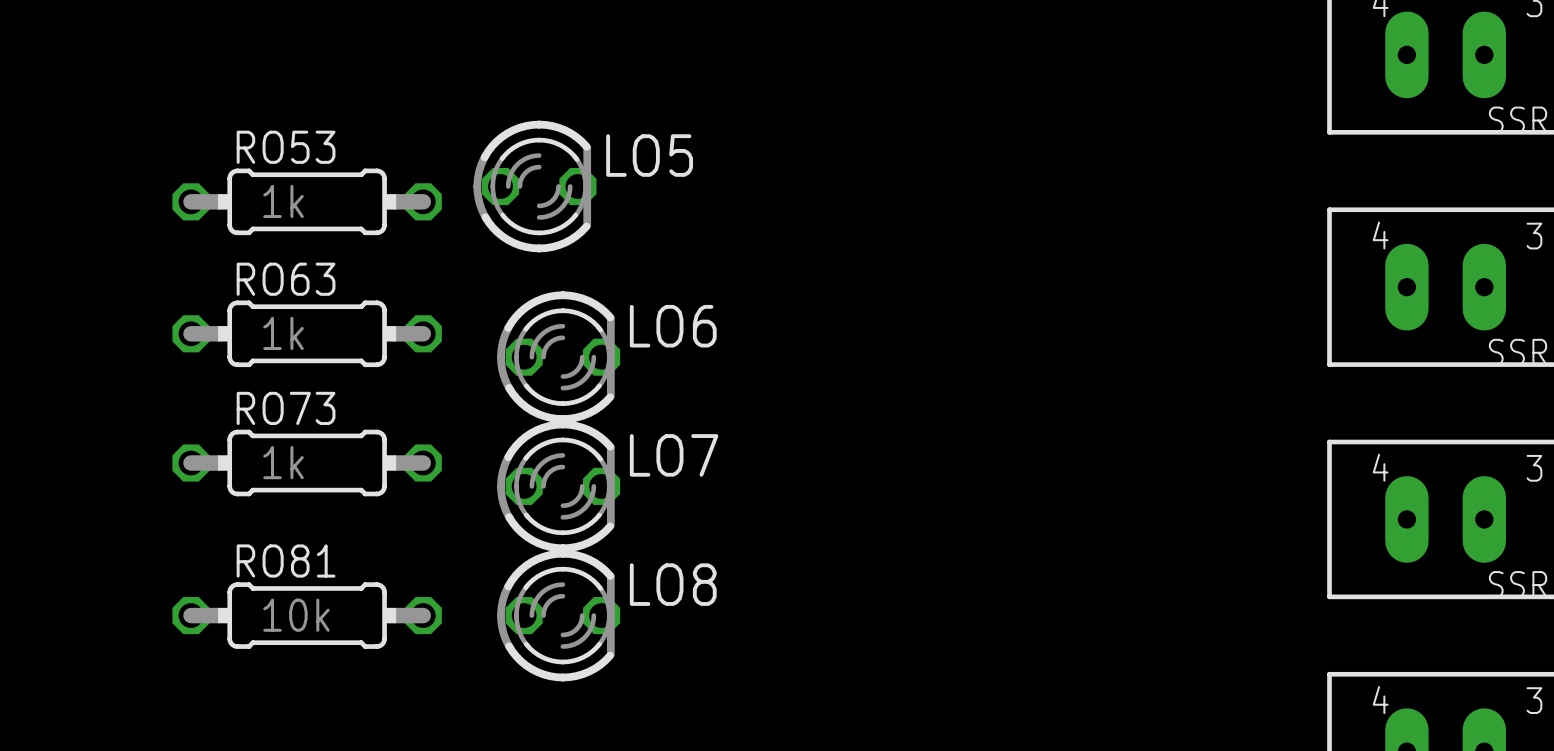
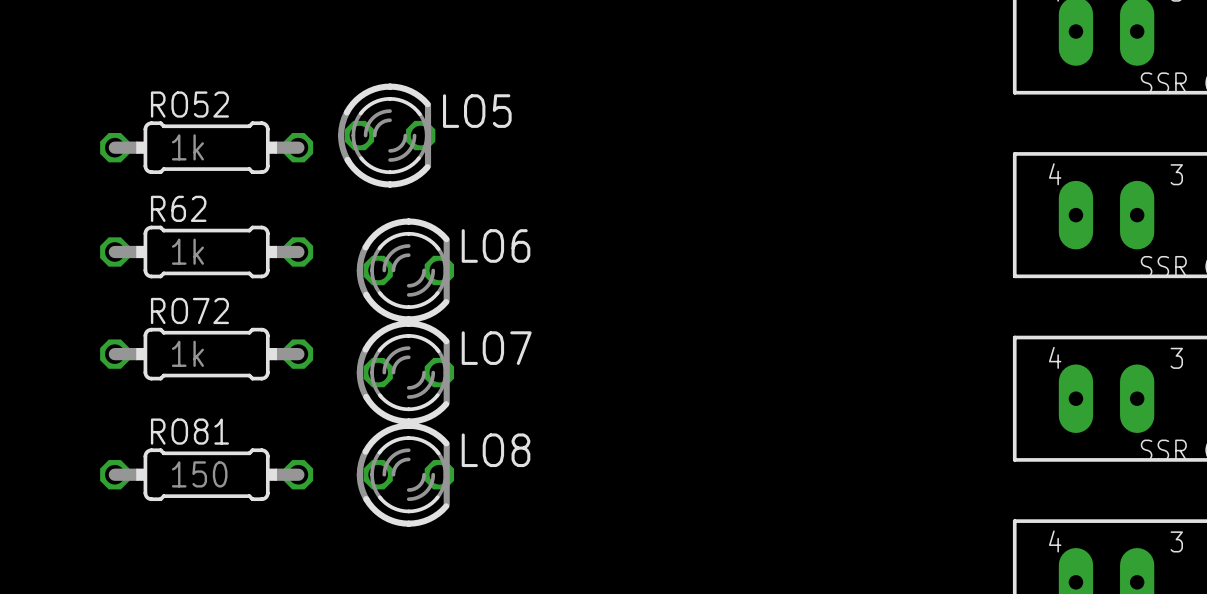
RO53 name: RO53 (286, 147) -> RO52 (189, 104)
RO63 name: RO63 (286, 279) -> R62 (178, 208)
RO73 name: RO73 (286, 408) -> RO72 (189, 310)
RO81 value: 10k (296, 615) -> 150 (199, 474)

